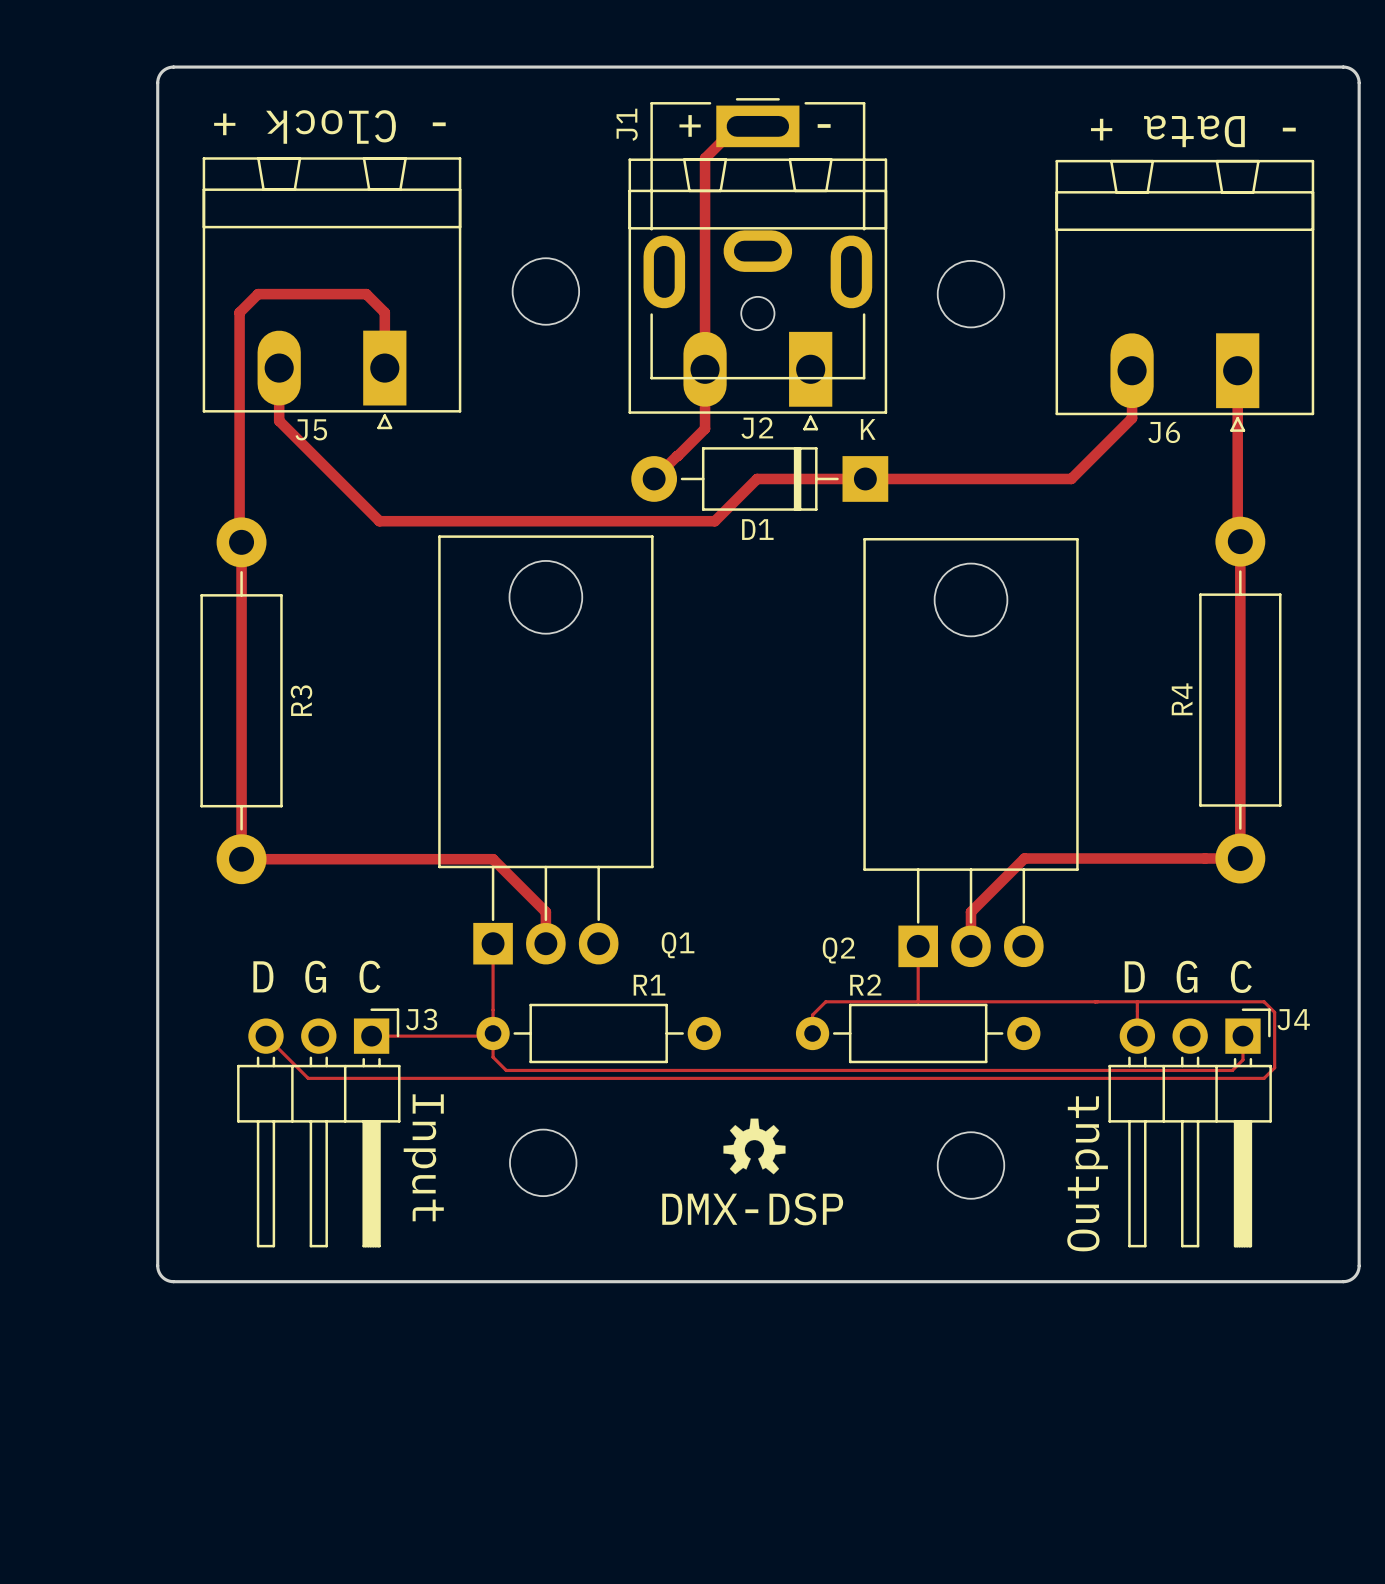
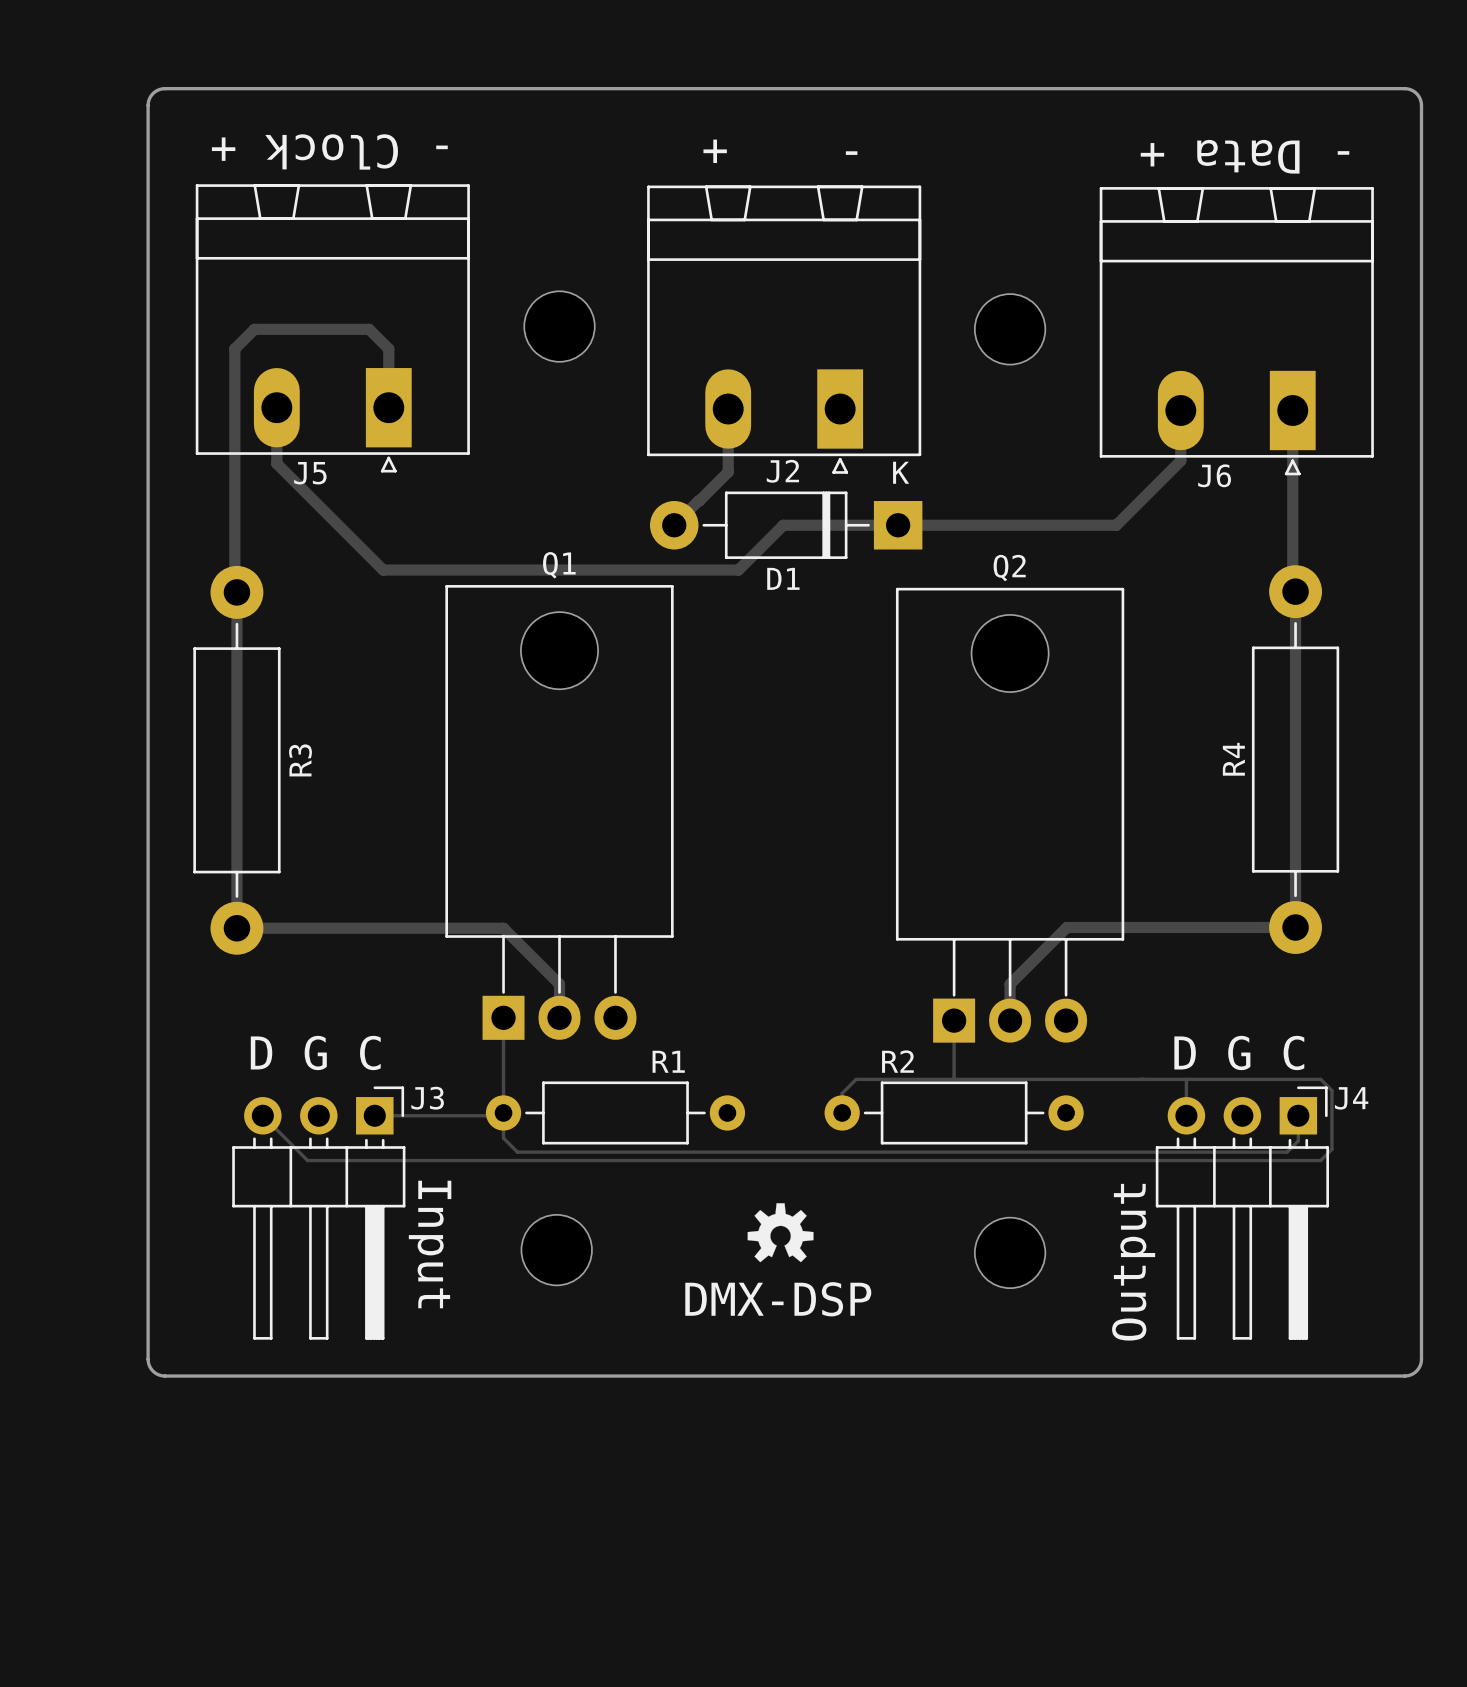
track: (757, 126) (737, 126) (705, 158) (705, 369) -> none
J1: (757, 238) -> none
Q1 name position: Q1 (678, 945) -> Q1 (559, 565)
Q2 name position: Q2 (838, 950) -> Q2 (1009, 568)

